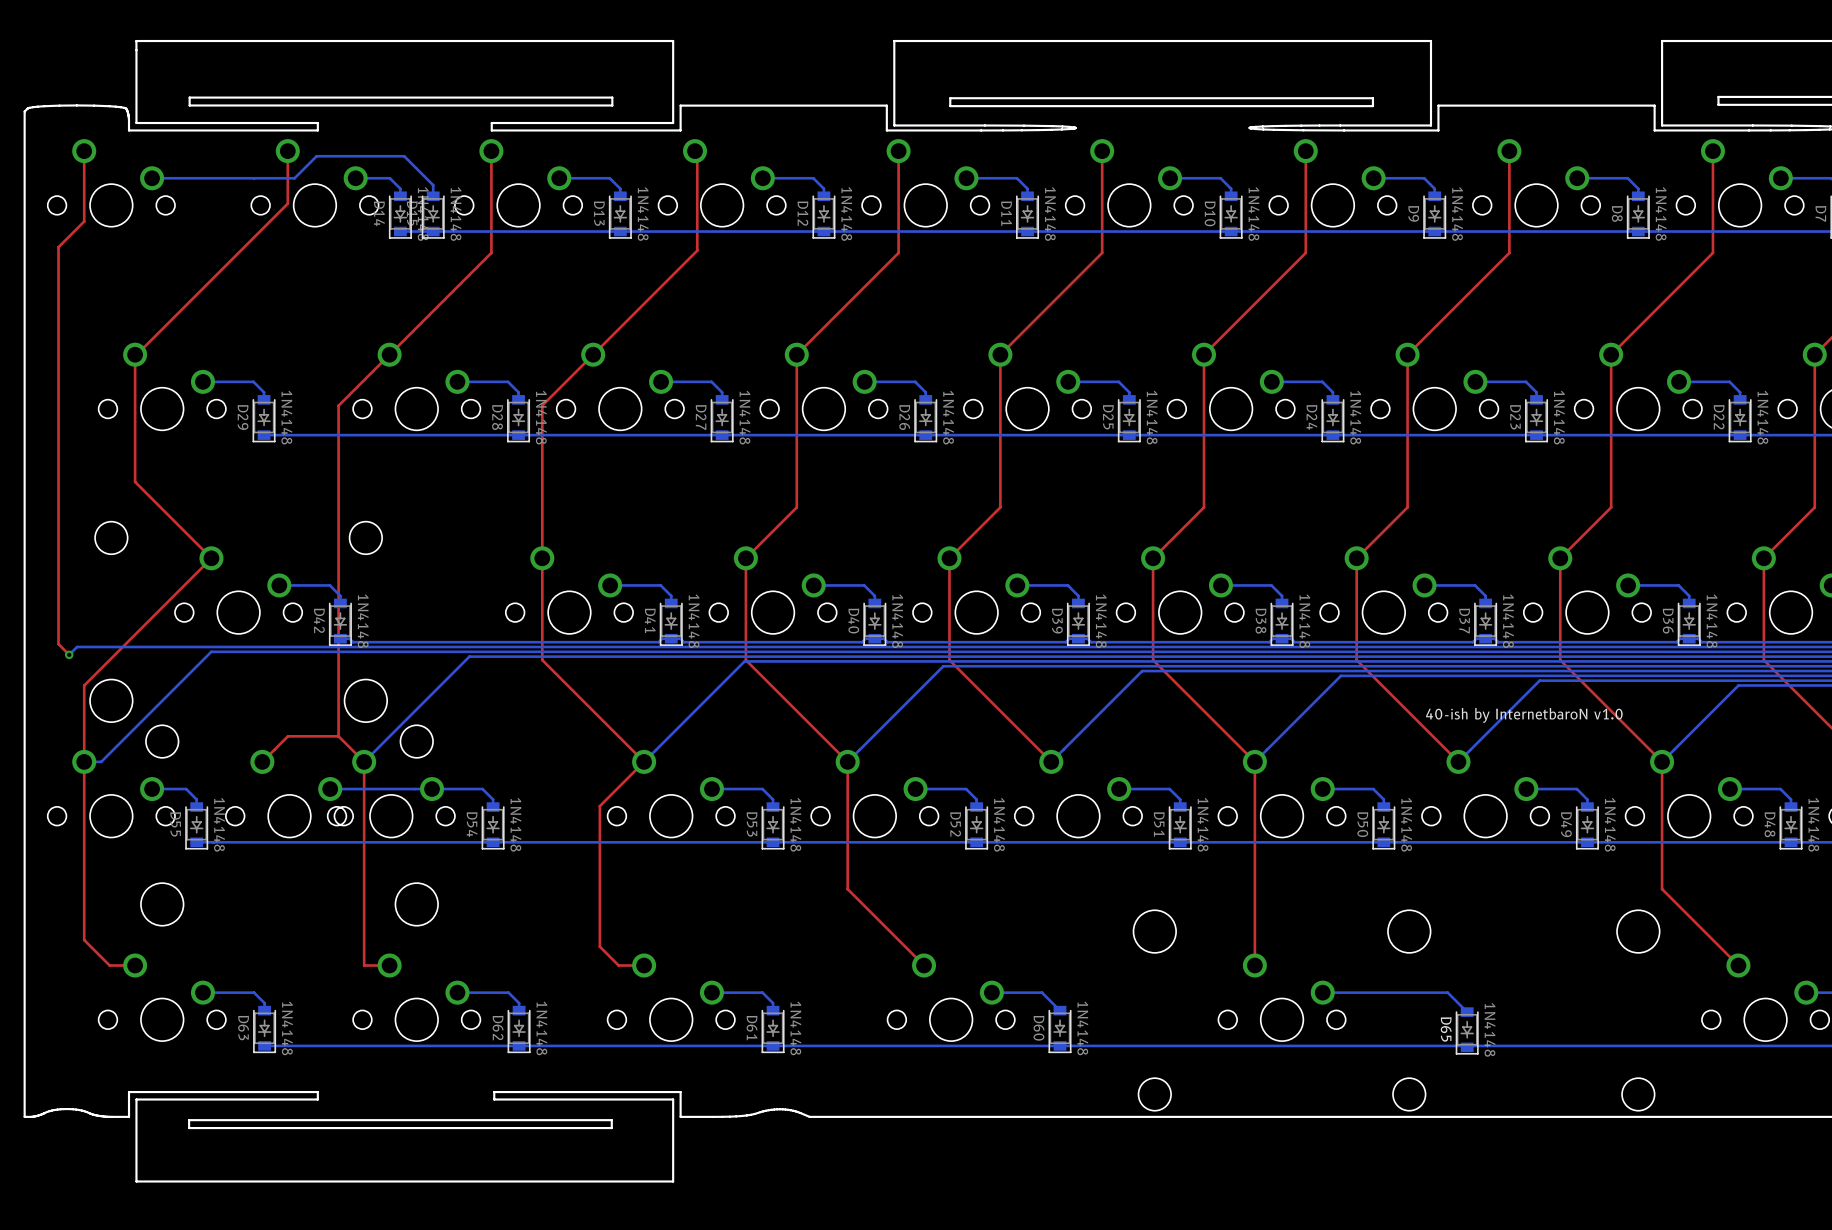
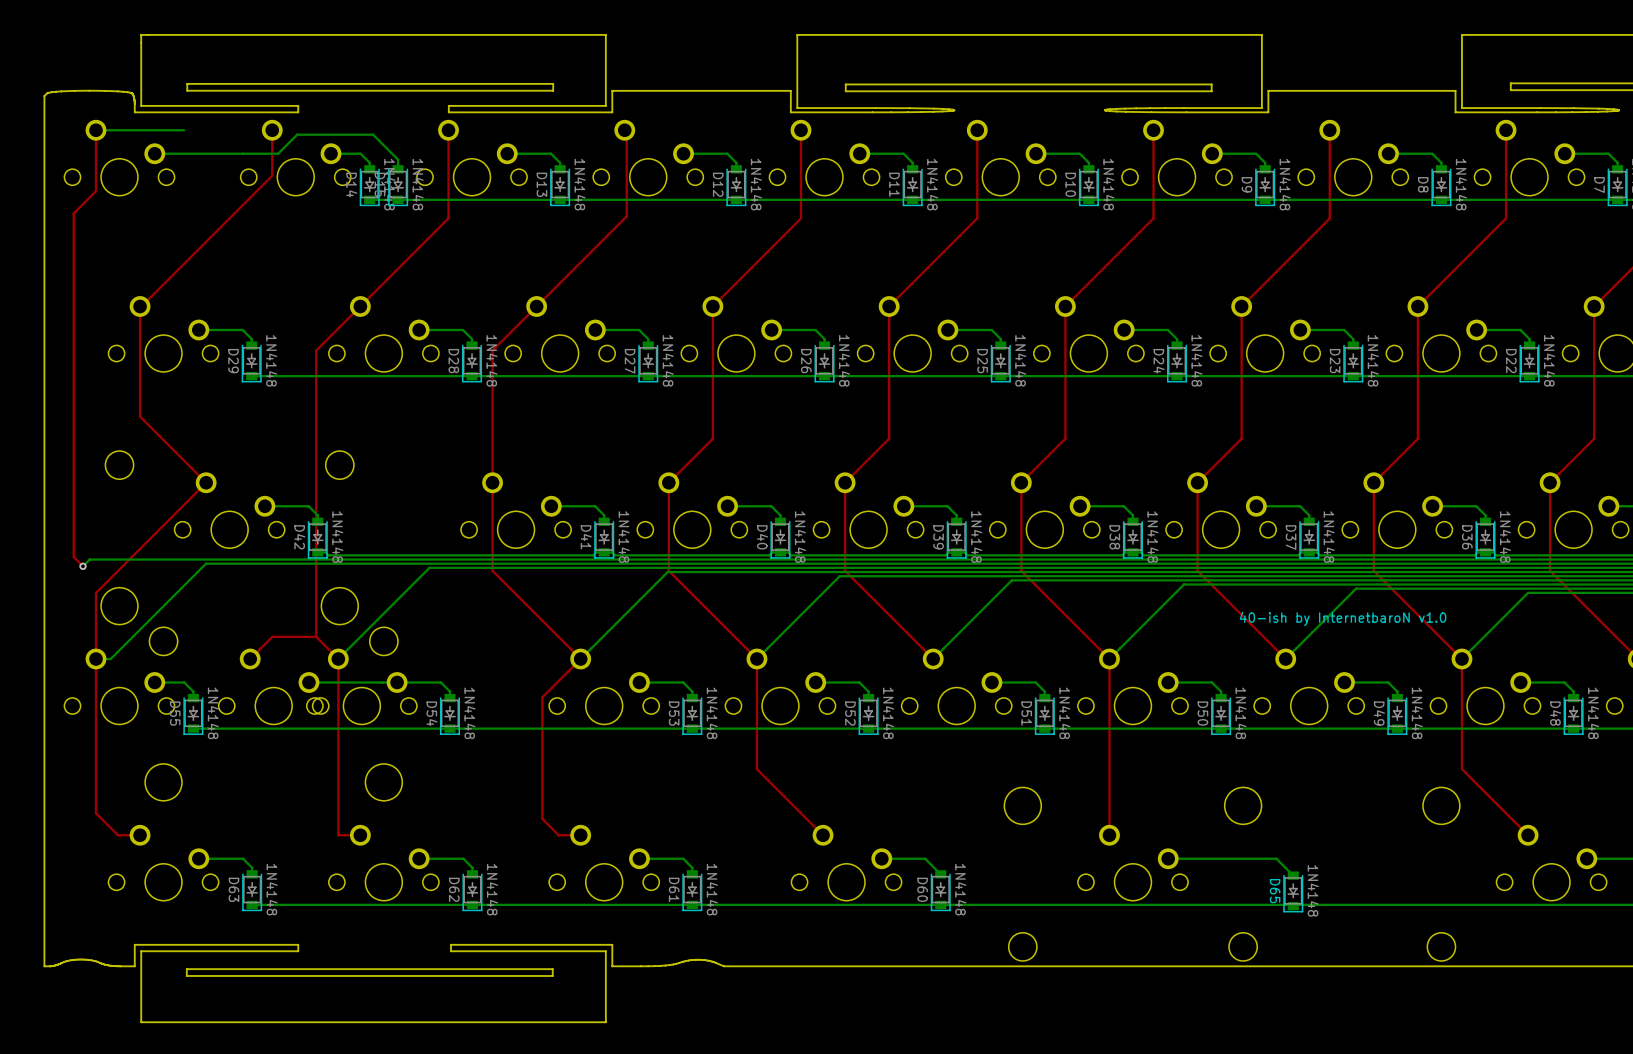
bottom track: none -> (184, 130) (96, 130)

